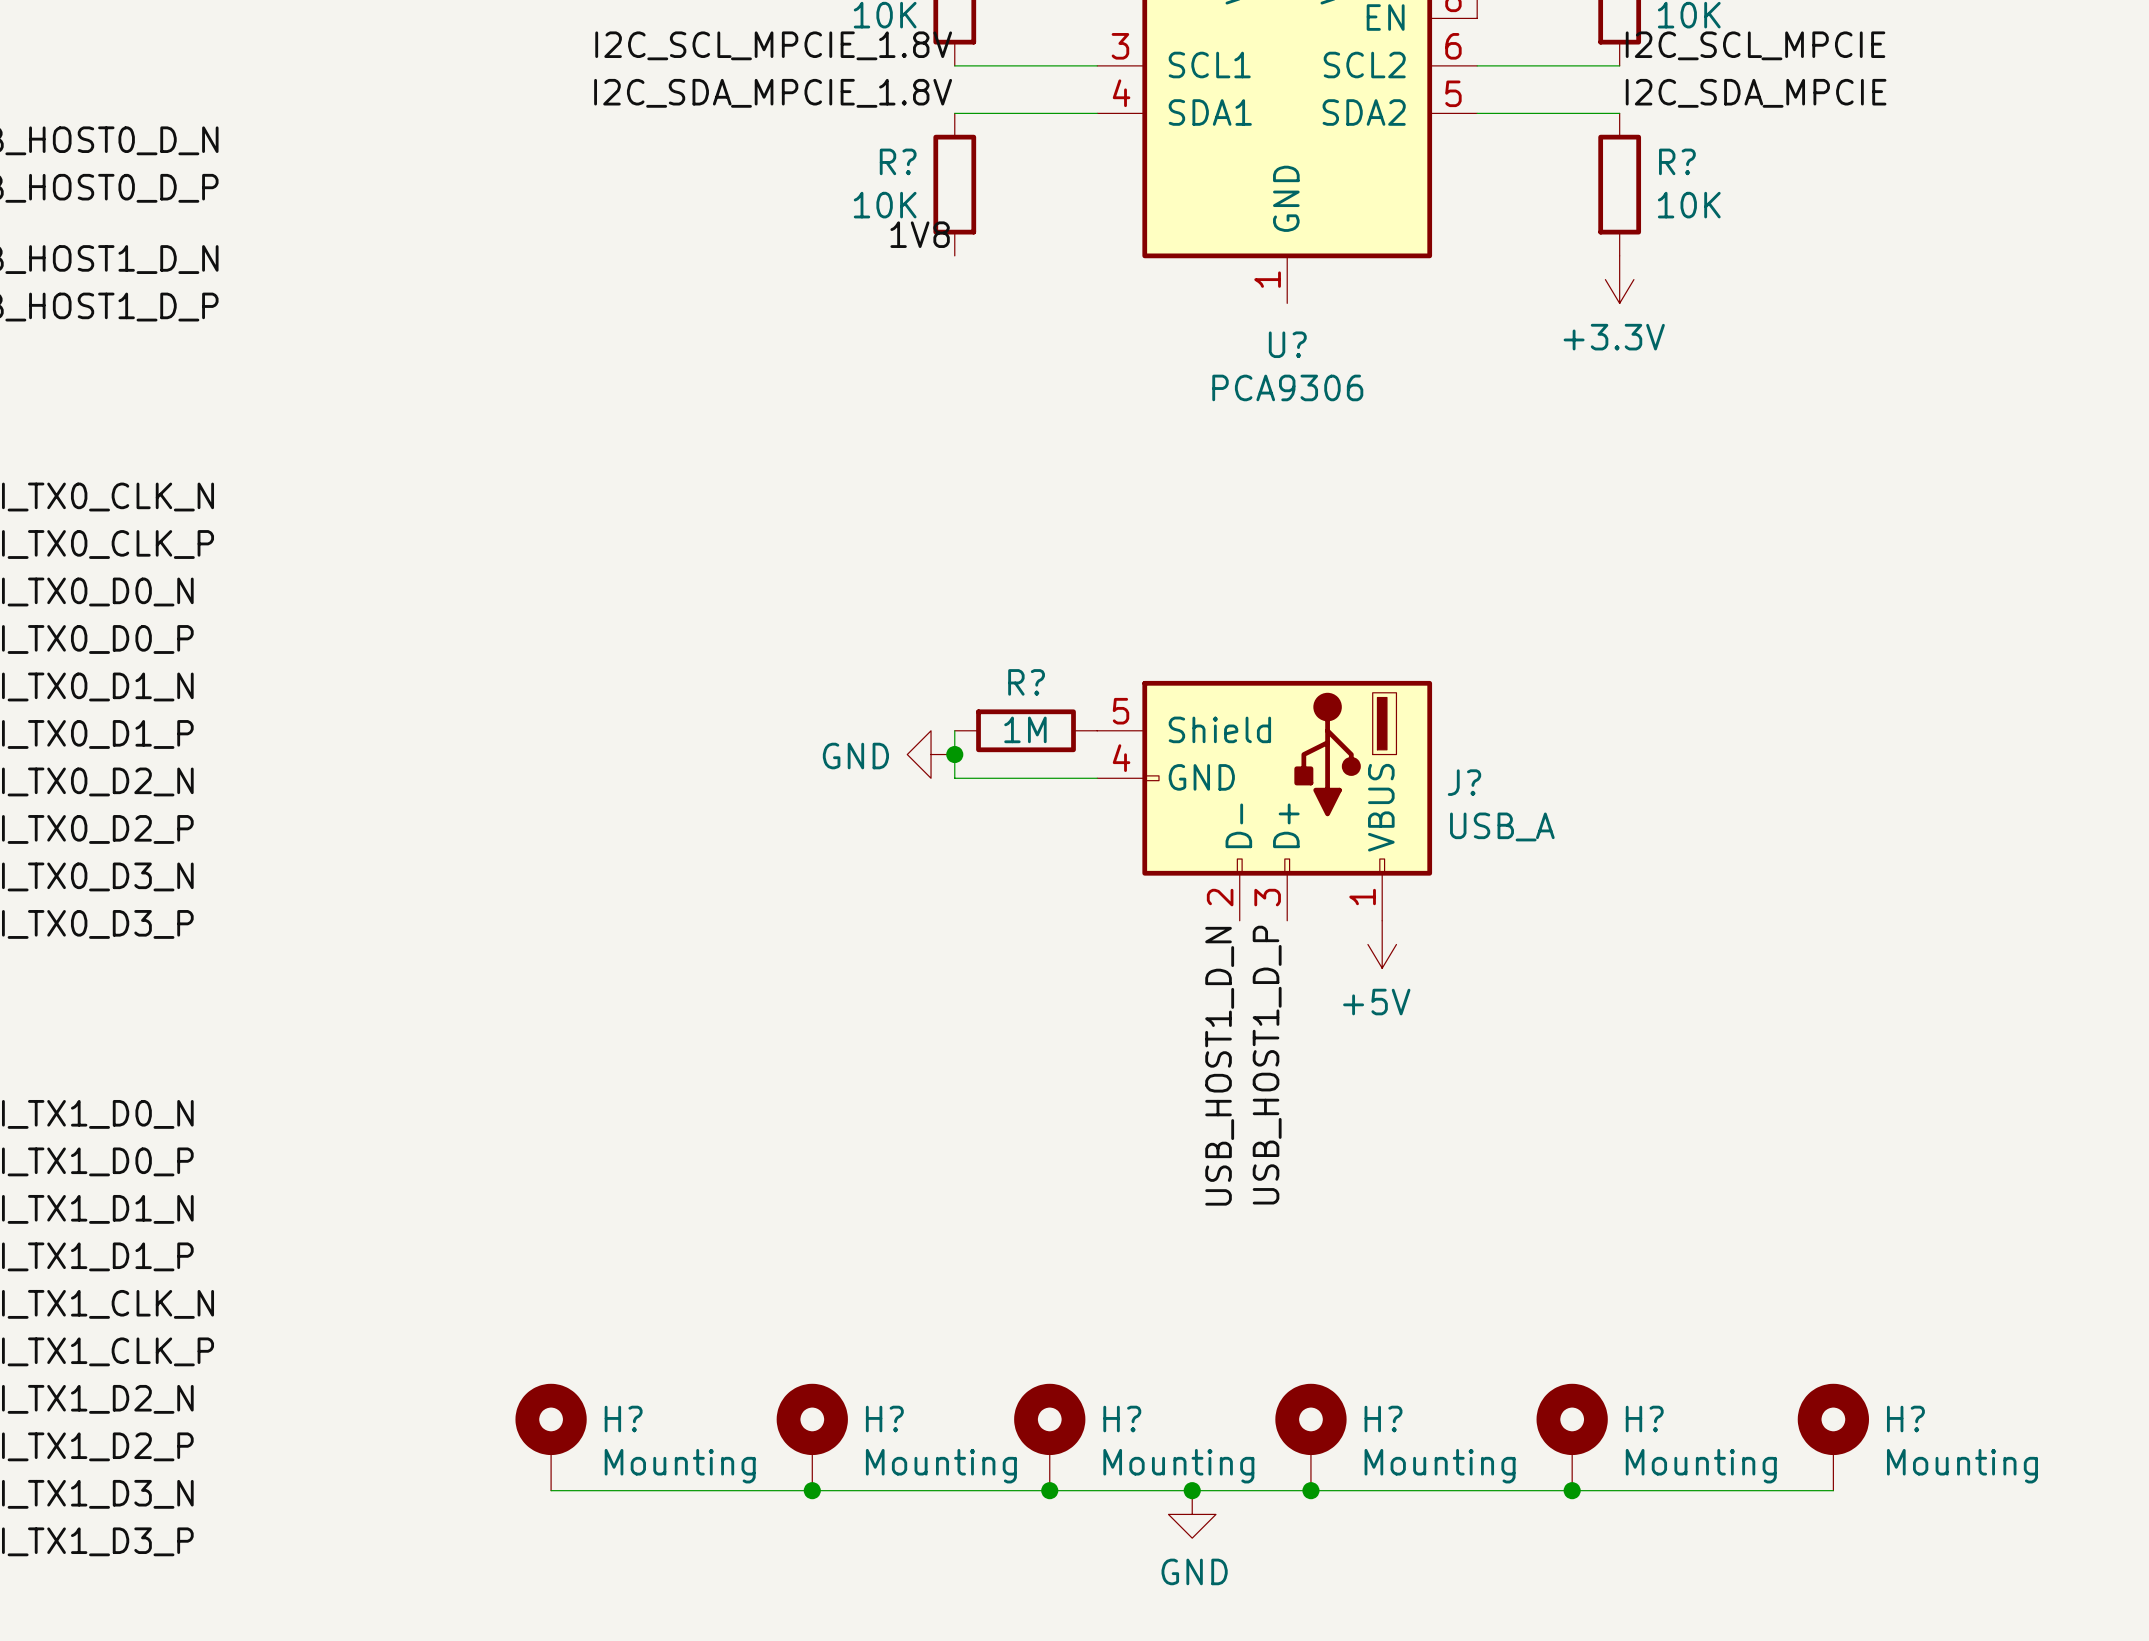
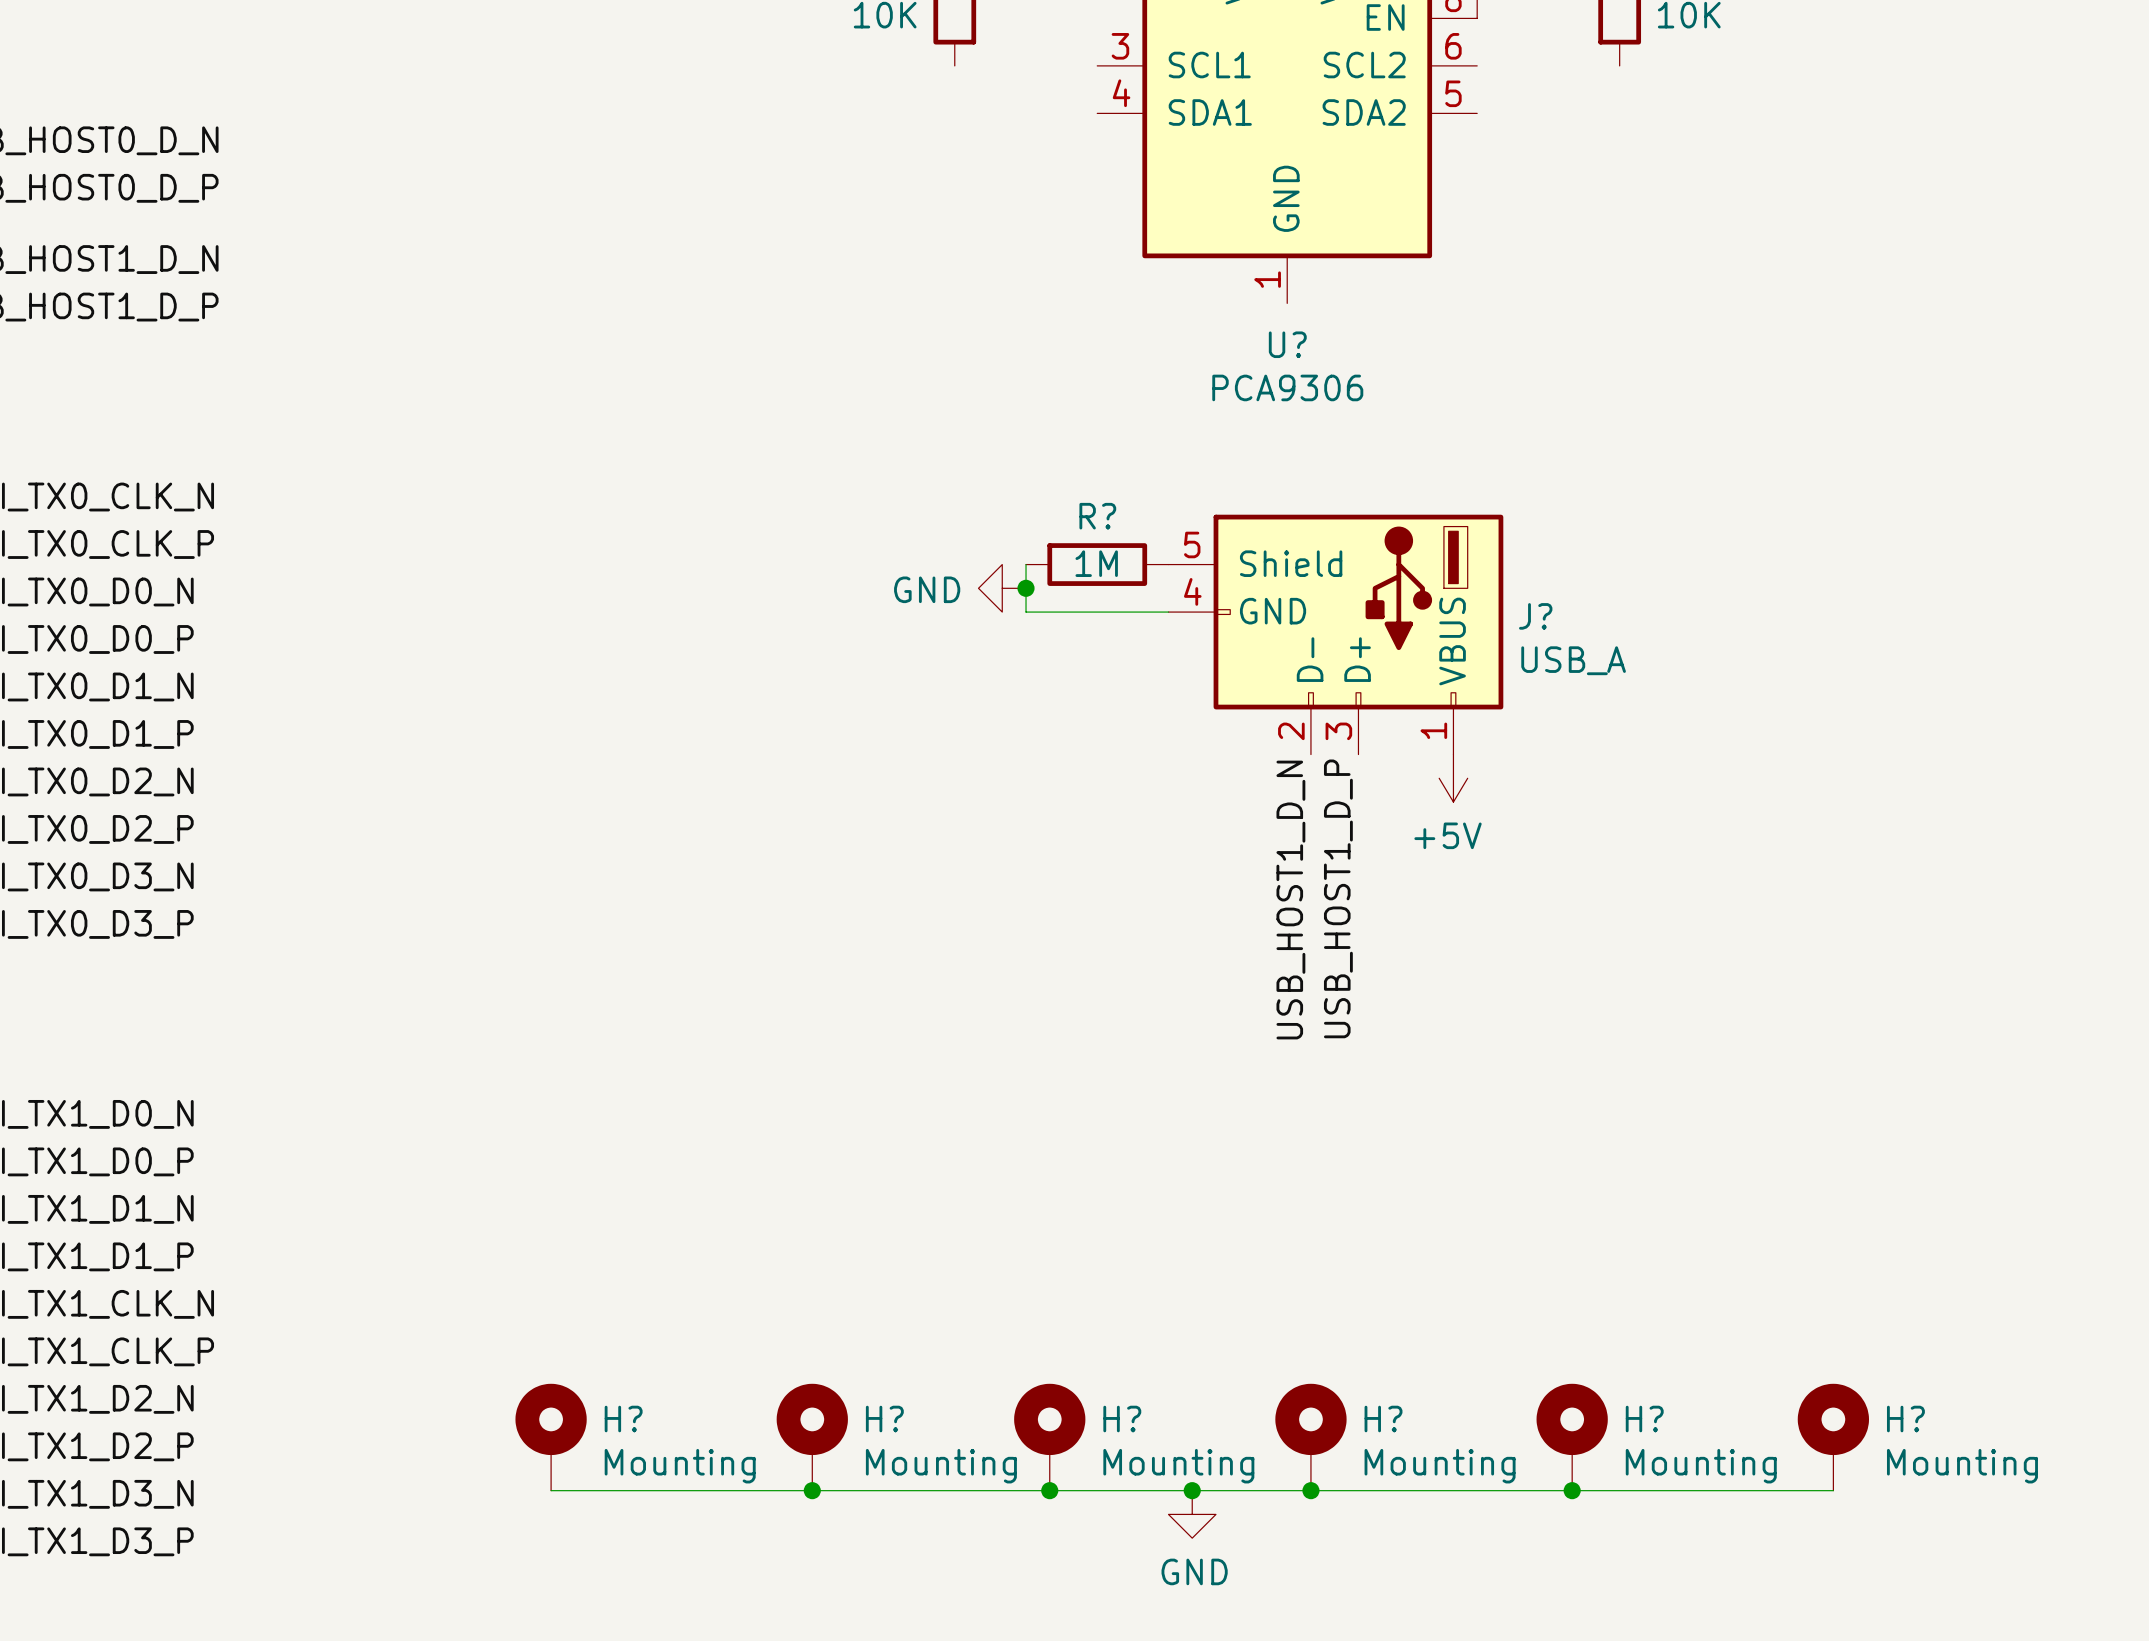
label: I2C_SCL_MPCIE_1.8V (773, 45) -> none
label: I2C_SCL_MPCIE (1755, 45) -> none
wire: (954, 65) (1097, 65) -> none
wire: (1477, 65) (1619, 65) -> none
label: I2C_SDA_MPCIE_1.8V (773, 93) -> none
label: I2C_SDA_MPCIE (1756, 93) -> none
wire: (954, 113) (1097, 113) -> none
wire: (1477, 113) (1619, 113) -> none
R?: 10K (954, 184) -> none
R?: 10K (1619, 184) -> none
label: 1V8 (920, 234) -> none
power symbol: +3.3V (1619, 279) -> none
junction: none -> (1026, 588)
wire: (954, 730) (954, 778) (1097, 778) -> (1026, 564) (1026, 612) (1168, 612)
R? position: (1026, 730) -> (1097, 564)
power symbol position: GND (931, 754) -> GND (1002, 588)
junction: (954, 754) -> none
J? position: (1264, 800) -> (1335, 634)
power symbol position: +5V (1382, 944) -> +5V (1453, 778)
label position: USB_HOST1_D_P (1267, 1065) -> USB_HOST1_D_P (1338, 898)
label position: USB_HOST1_D_N (1219, 1066) -> USB_HOST1_D_N (1290, 900)

